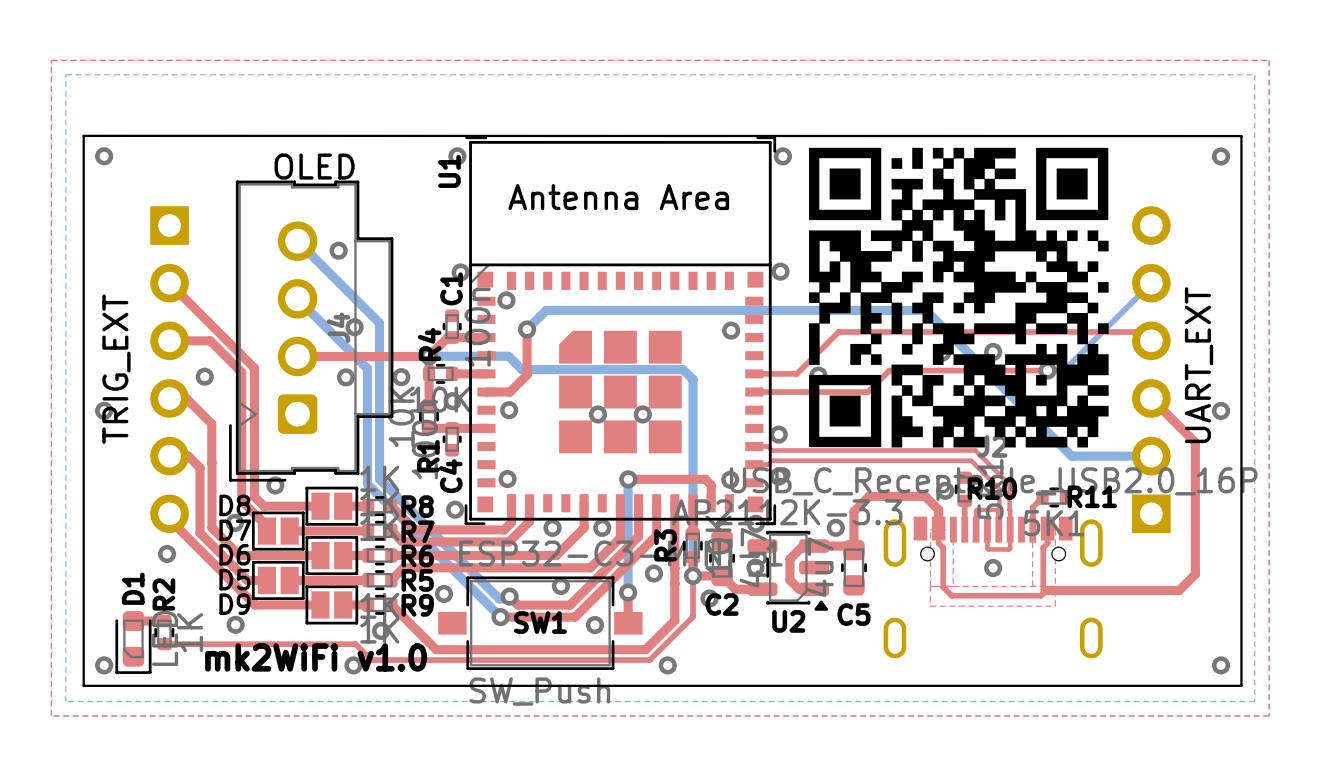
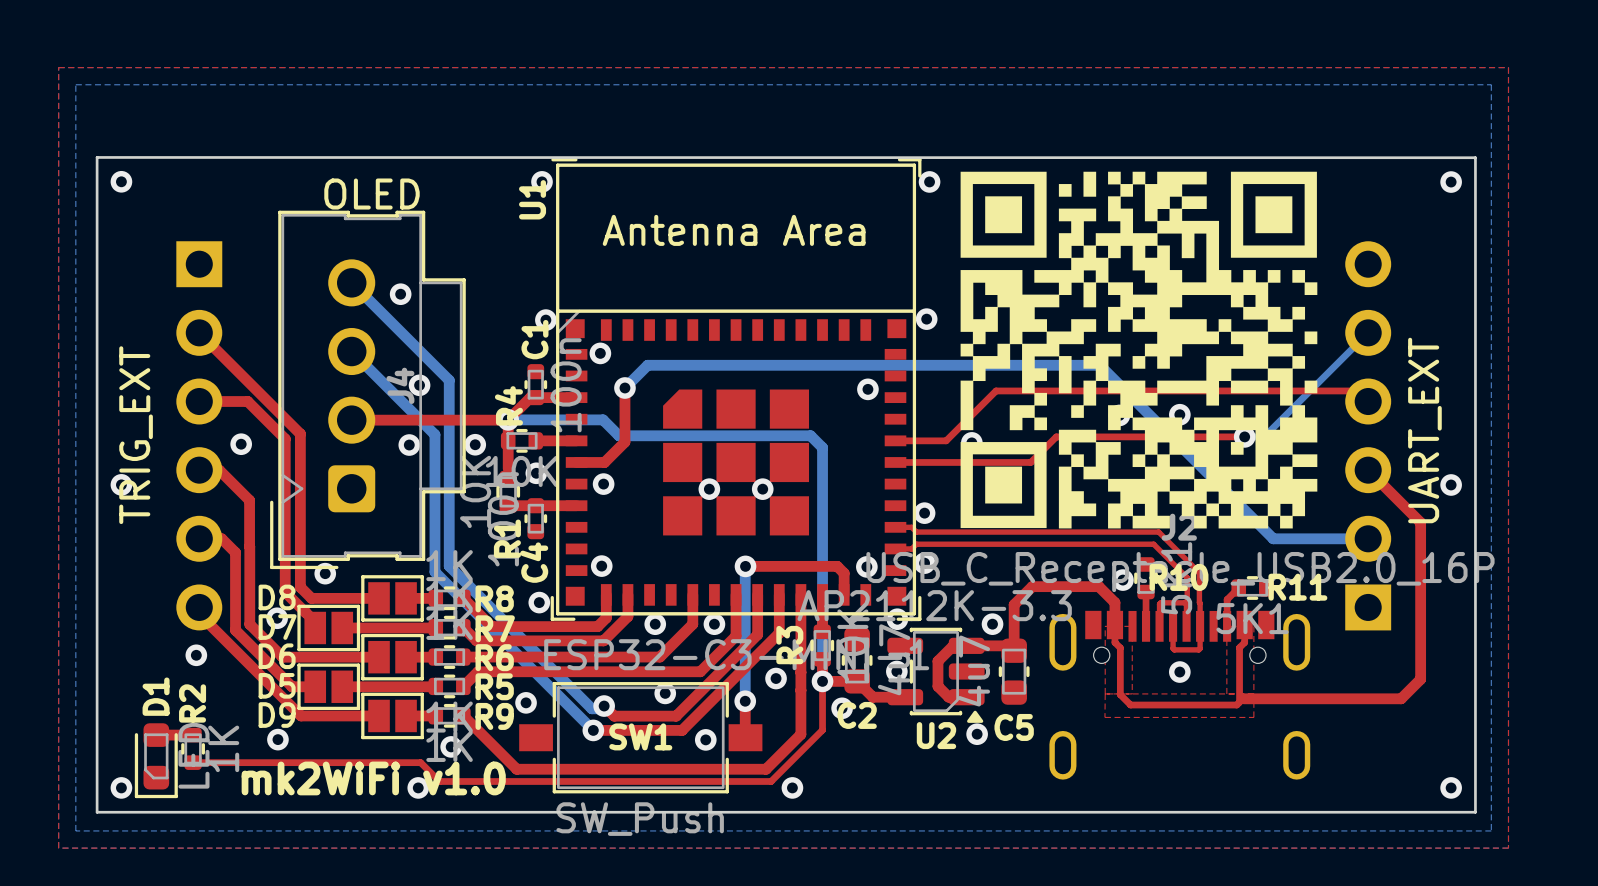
via: none -> (977, 734)

